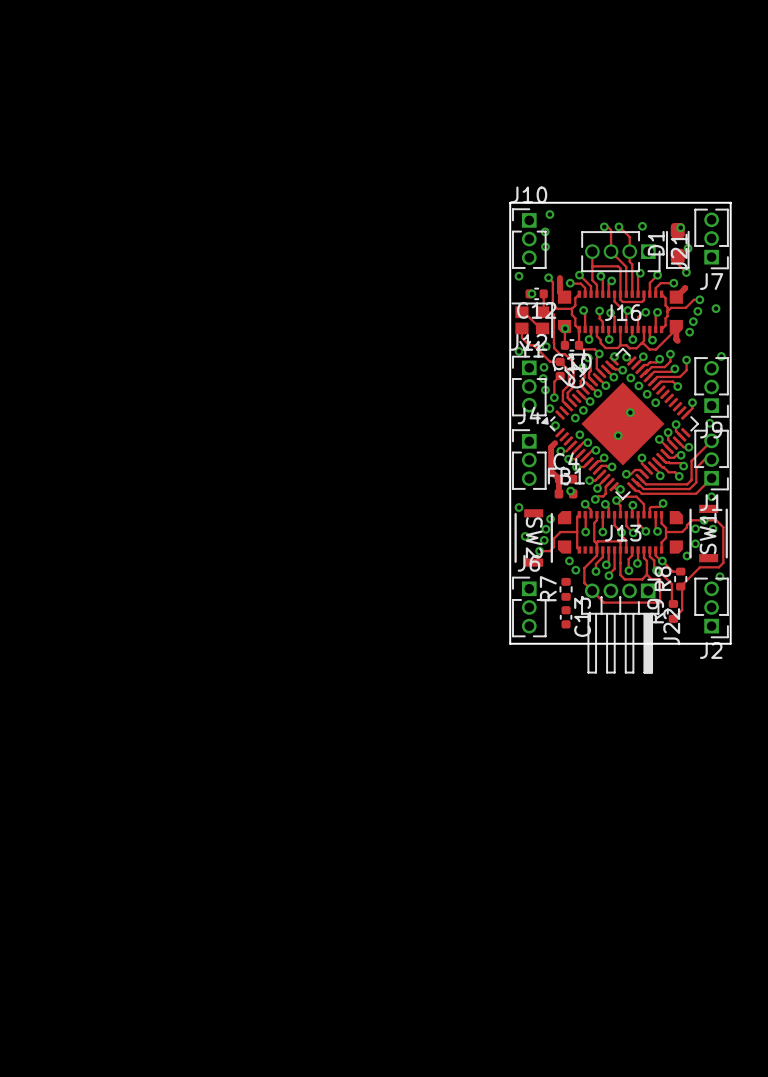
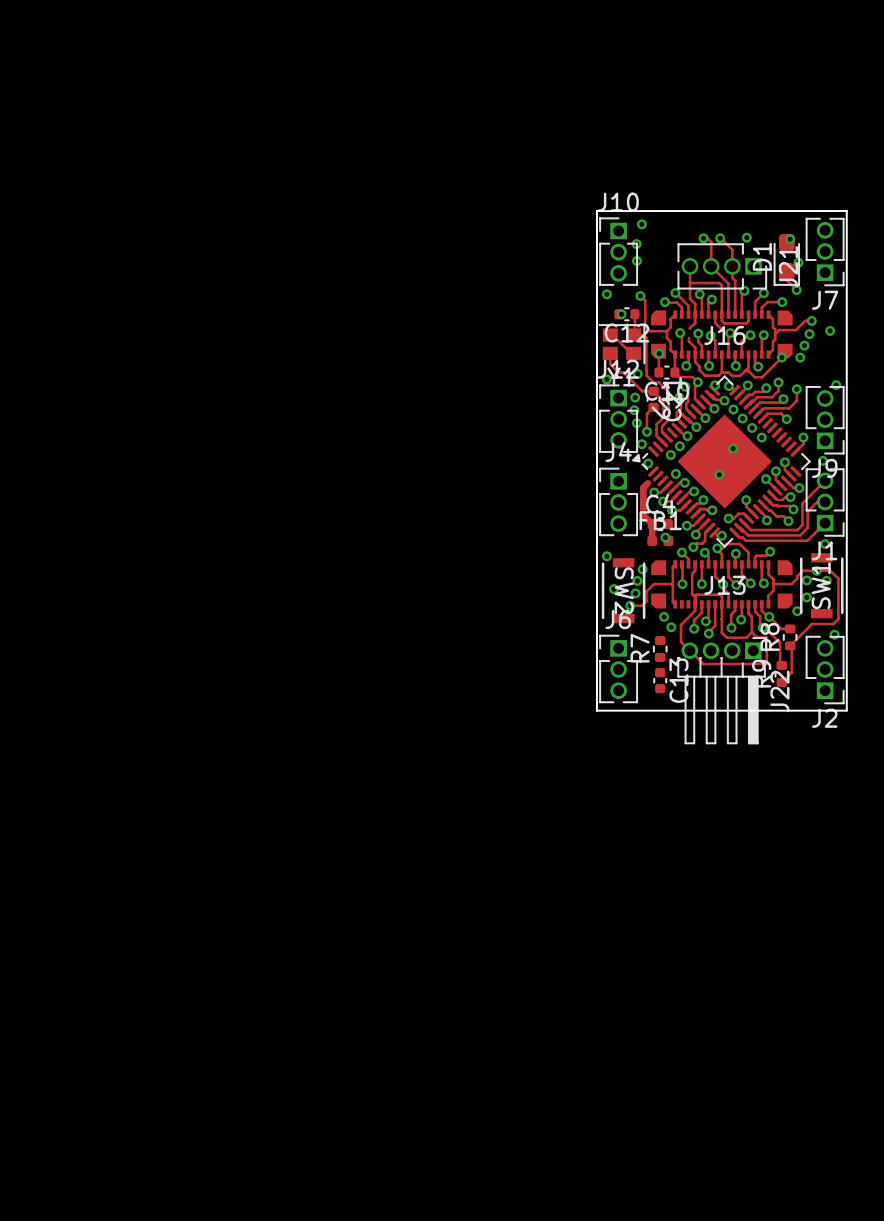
track: (559, 277) (559, 292) (564, 297) -> none
track: (685, 288) (676, 297) -> none
track: none -> (695, 314) (695, 323) (689, 328)
track: none -> (688, 337) (688, 341) (695, 347) (695, 354)
track: (676, 326) (677, 340) -> none
via: none -> (781, 357)

